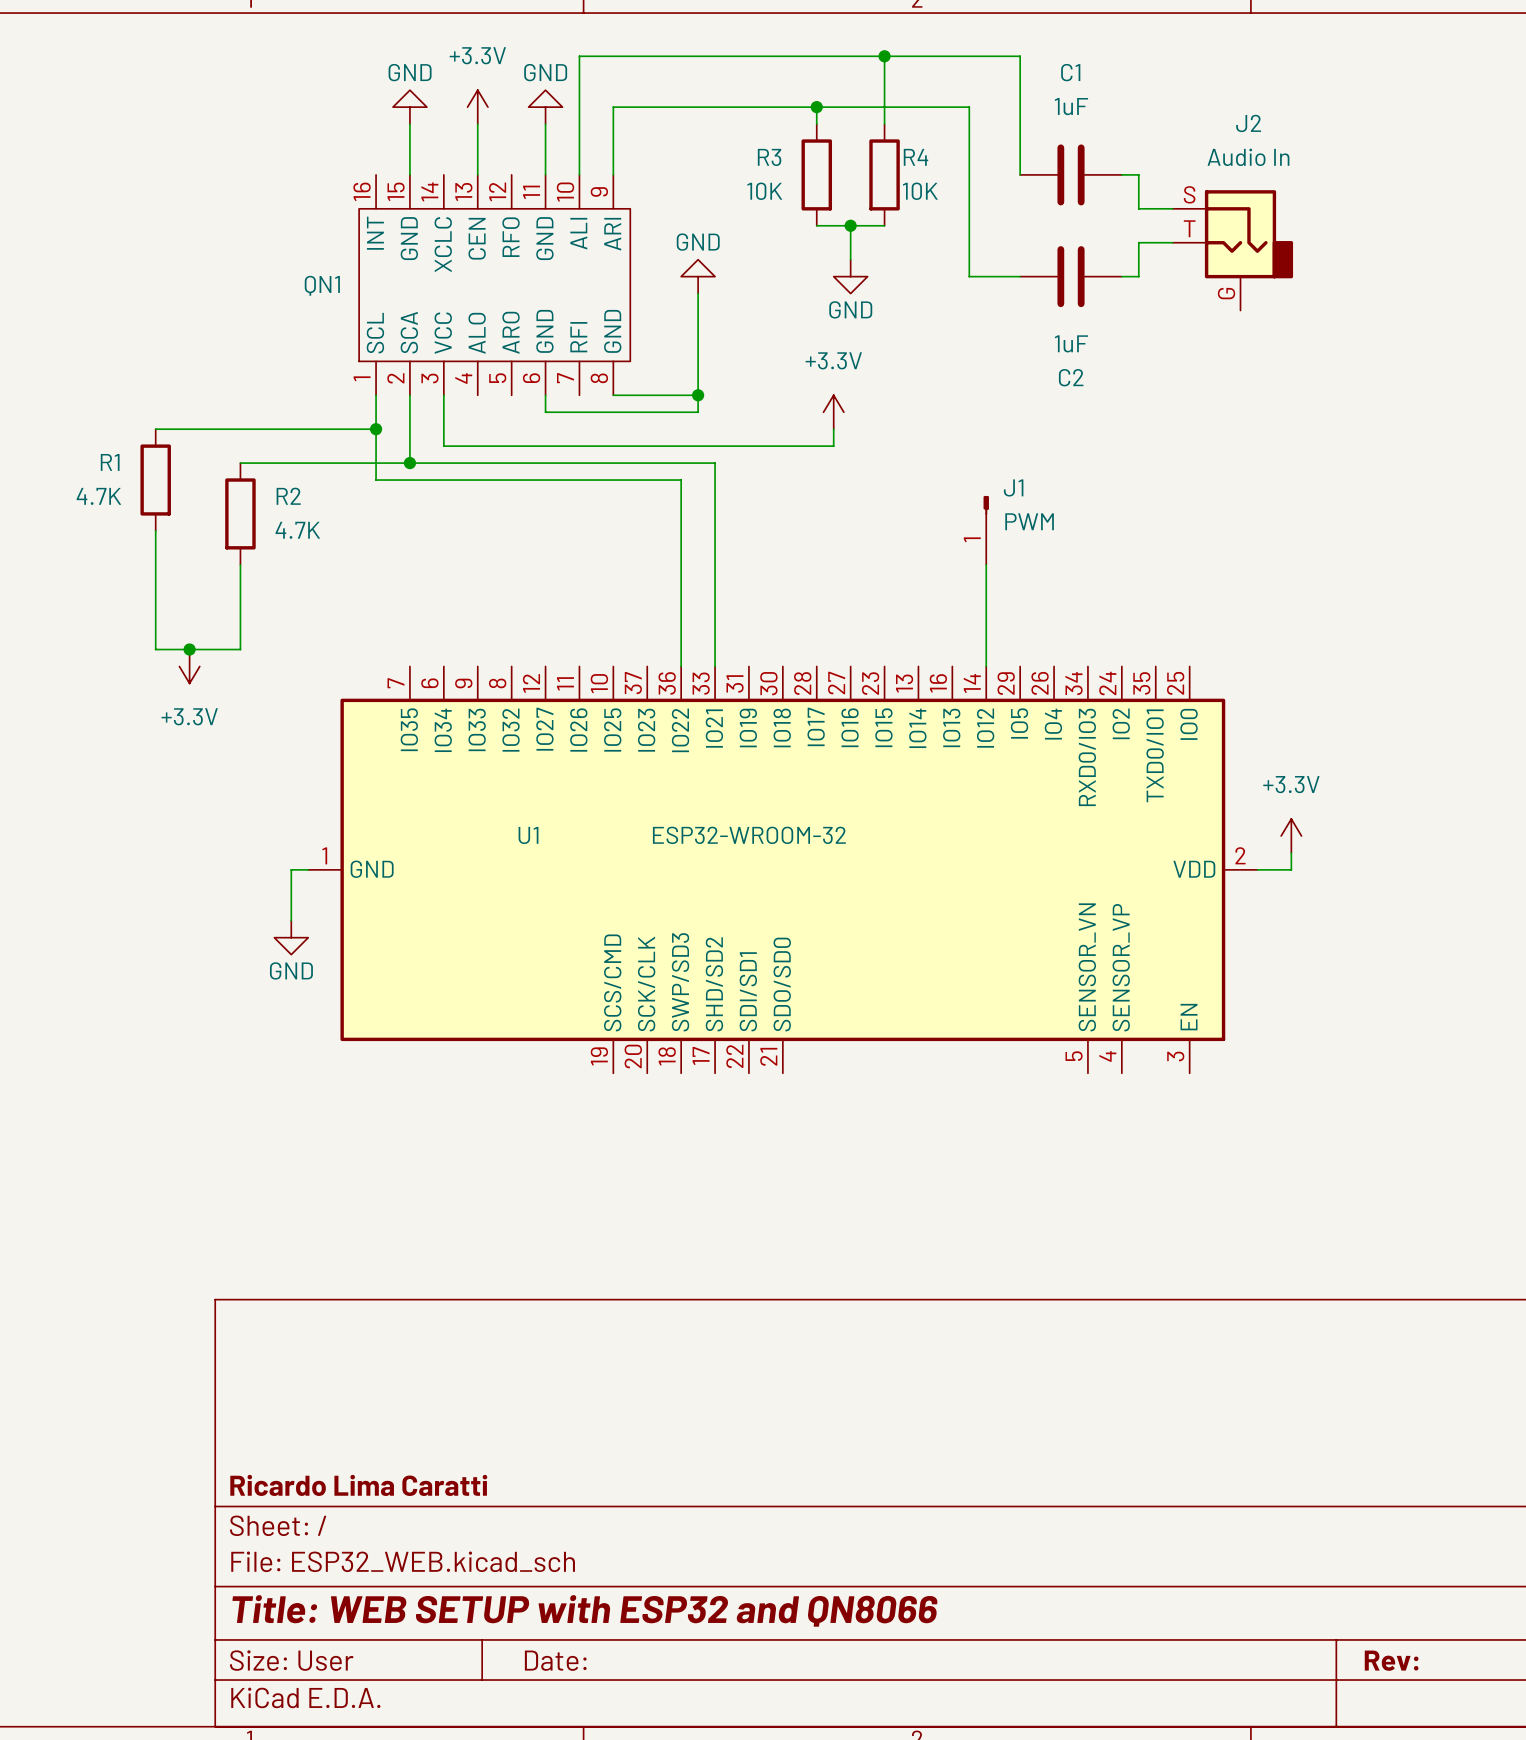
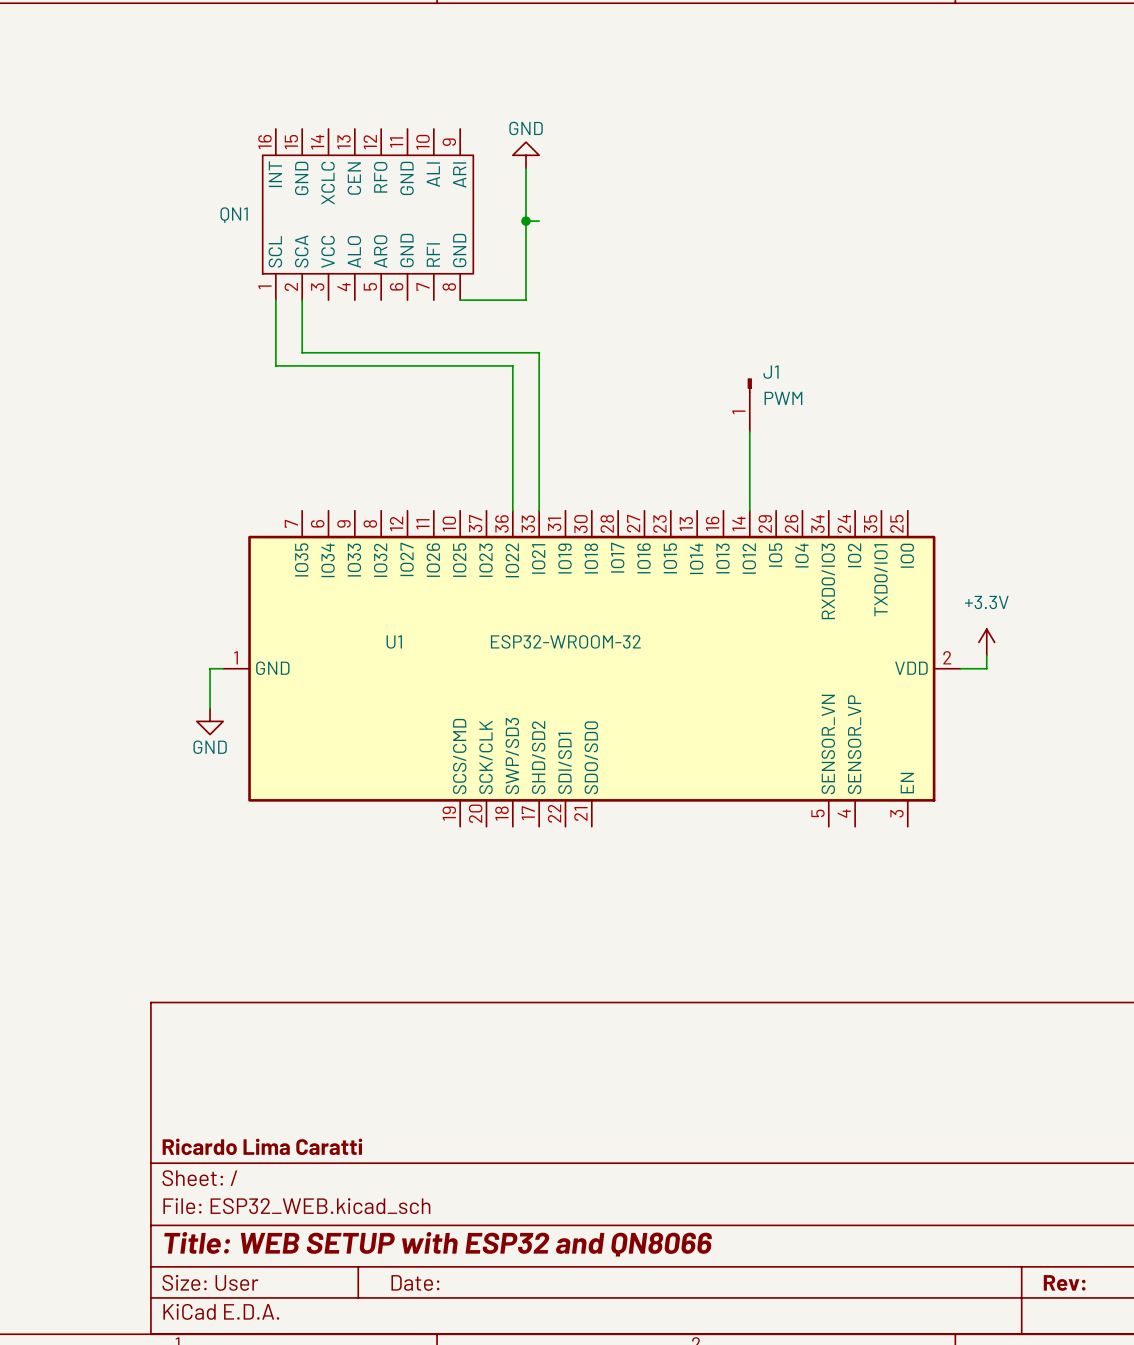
wire: (884, 56) (884, 124) -> none
junction: (884, 56) -> none
power symbol: GND (409, 107) -> none
power symbol: +3.3V (477, 107) -> none
power symbol: GND (545, 107) -> none
wire: (816, 107) (816, 124) -> none
junction: (816, 107) -> none
wire: (409, 124) (409, 174) -> none
wire: (477, 124) (477, 174) -> none
wire: (545, 124) (545, 174) -> none
wire: (579, 174) (579, 56) (1020, 56) (1020, 174) -> none
wire: (613, 174) (613, 107) (969, 107) (969, 276) (1020, 276) -> none
R3: 10K (816, 174) -> none
R4: 10K (884, 174) -> none
C1: 1uF (1071, 174) -> none
wire: (1121, 174) (1138, 174) (1138, 208) (1172, 208) -> none
wire: none -> (525, 168) (525, 221) (539, 221)
wire: (816, 225) (884, 225) -> none
wire: (850, 225) (850, 259) -> none
junction: (850, 225) -> none
wire: (1172, 242) (1138, 242) (1138, 276) (1121, 276) -> none
J2: Audio In (1232, 250) -> none
power symbol position: GND (698, 276) -> GND (525, 155)
power symbol: GND (850, 276) -> none
C2: 1uF (1071, 276) -> none
junction: none -> (525, 221)
wire: (443, 395) (443, 446) (833, 446) (833, 429) -> none
wire: (545, 395) (545, 412) (698, 412) (698, 395) -> none
junction: (698, 395) -> none
power symbol: +3.3V (833, 412) -> none
wire: (155, 429) (376, 429) -> none
junction: (376, 429) -> none
wire: (240, 463) (409, 463) -> none
junction: (409, 463) -> none
R1: 4.7K (155, 480) -> none
R2: 4.7K (240, 513) -> none
wire: (155, 530) (155, 649) (240, 649) (240, 564) -> none
junction: (189, 649) -> none
power symbol: +3.3V (189, 666) -> none

